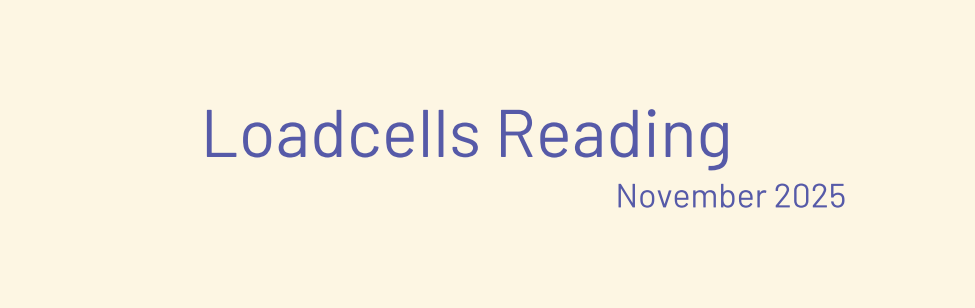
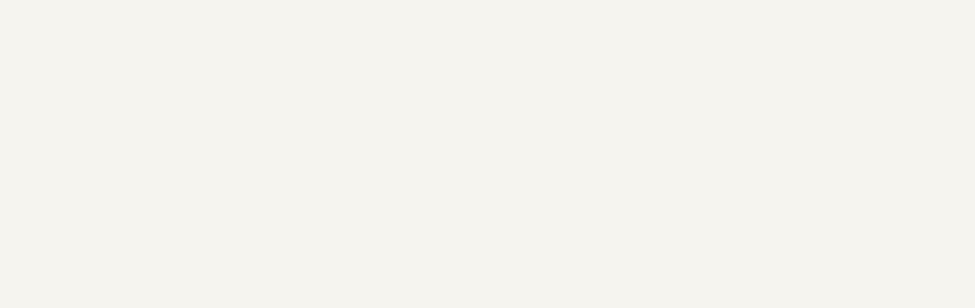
text: Loadcells Reading (467, 139) -> none
text: November 2025 (731, 195) -> none

